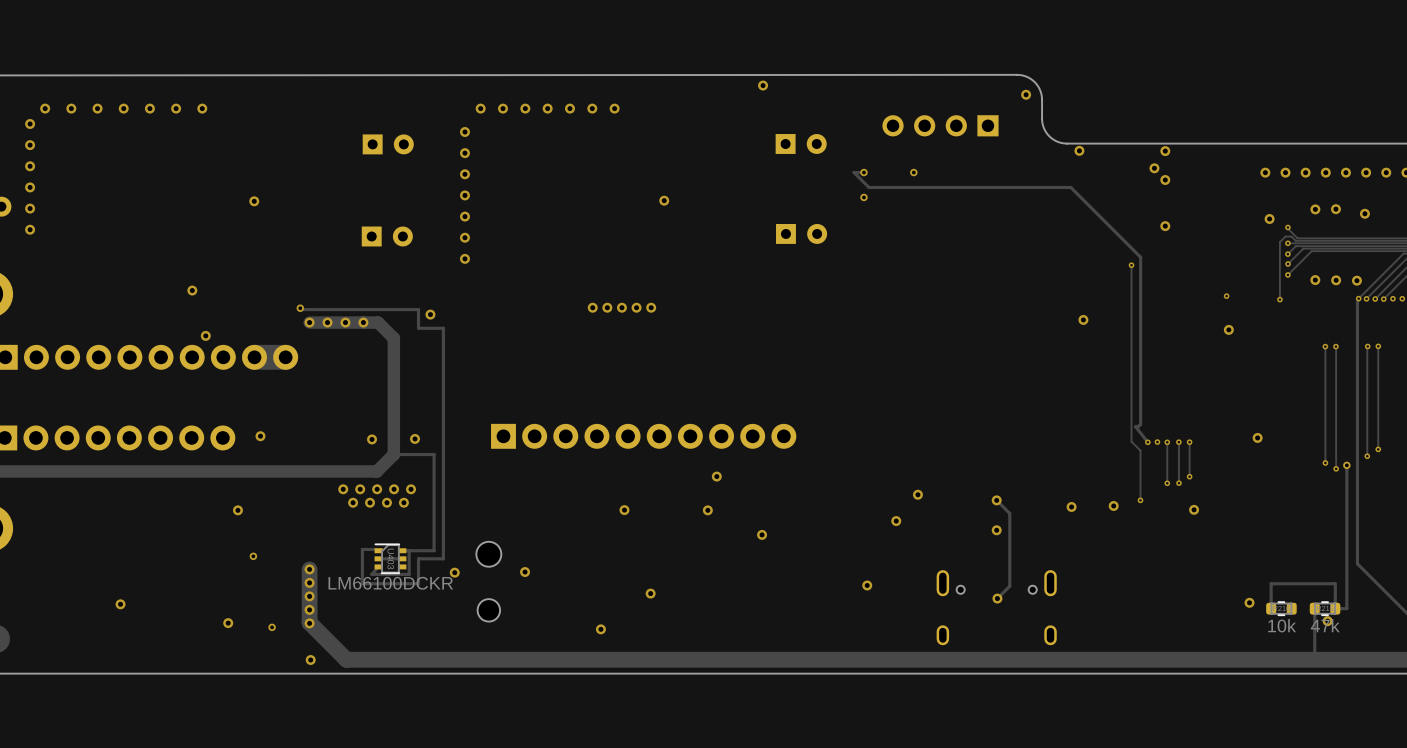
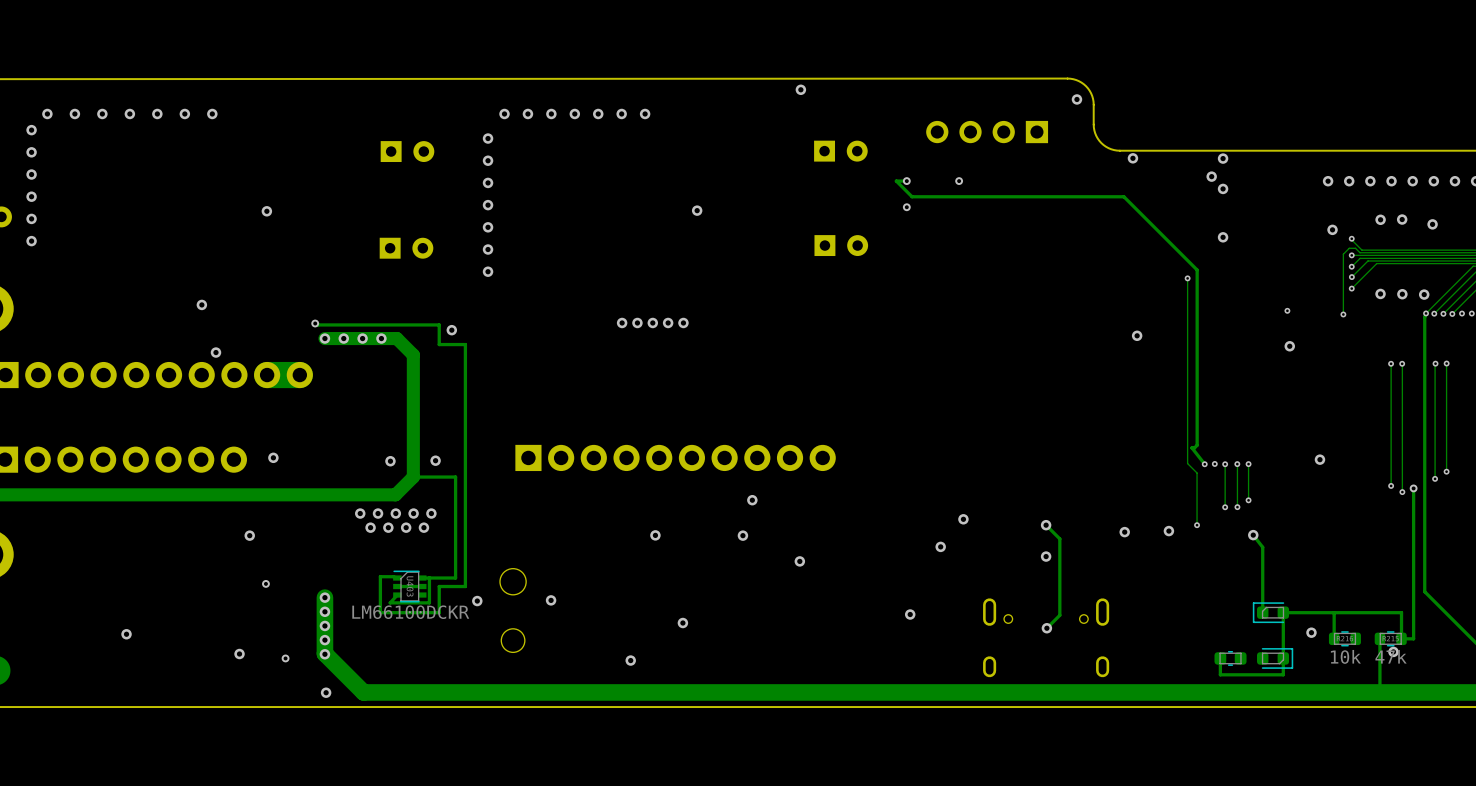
track: none -> (1253, 535) (1262, 547) (1262, 612)
part: none -> (1270, 612)
track: none -> (1334, 612) (1283, 612) (1283, 674) (1220, 674) (1220, 658)
part: none -> (1230, 658)
part: none -> (1275, 658)

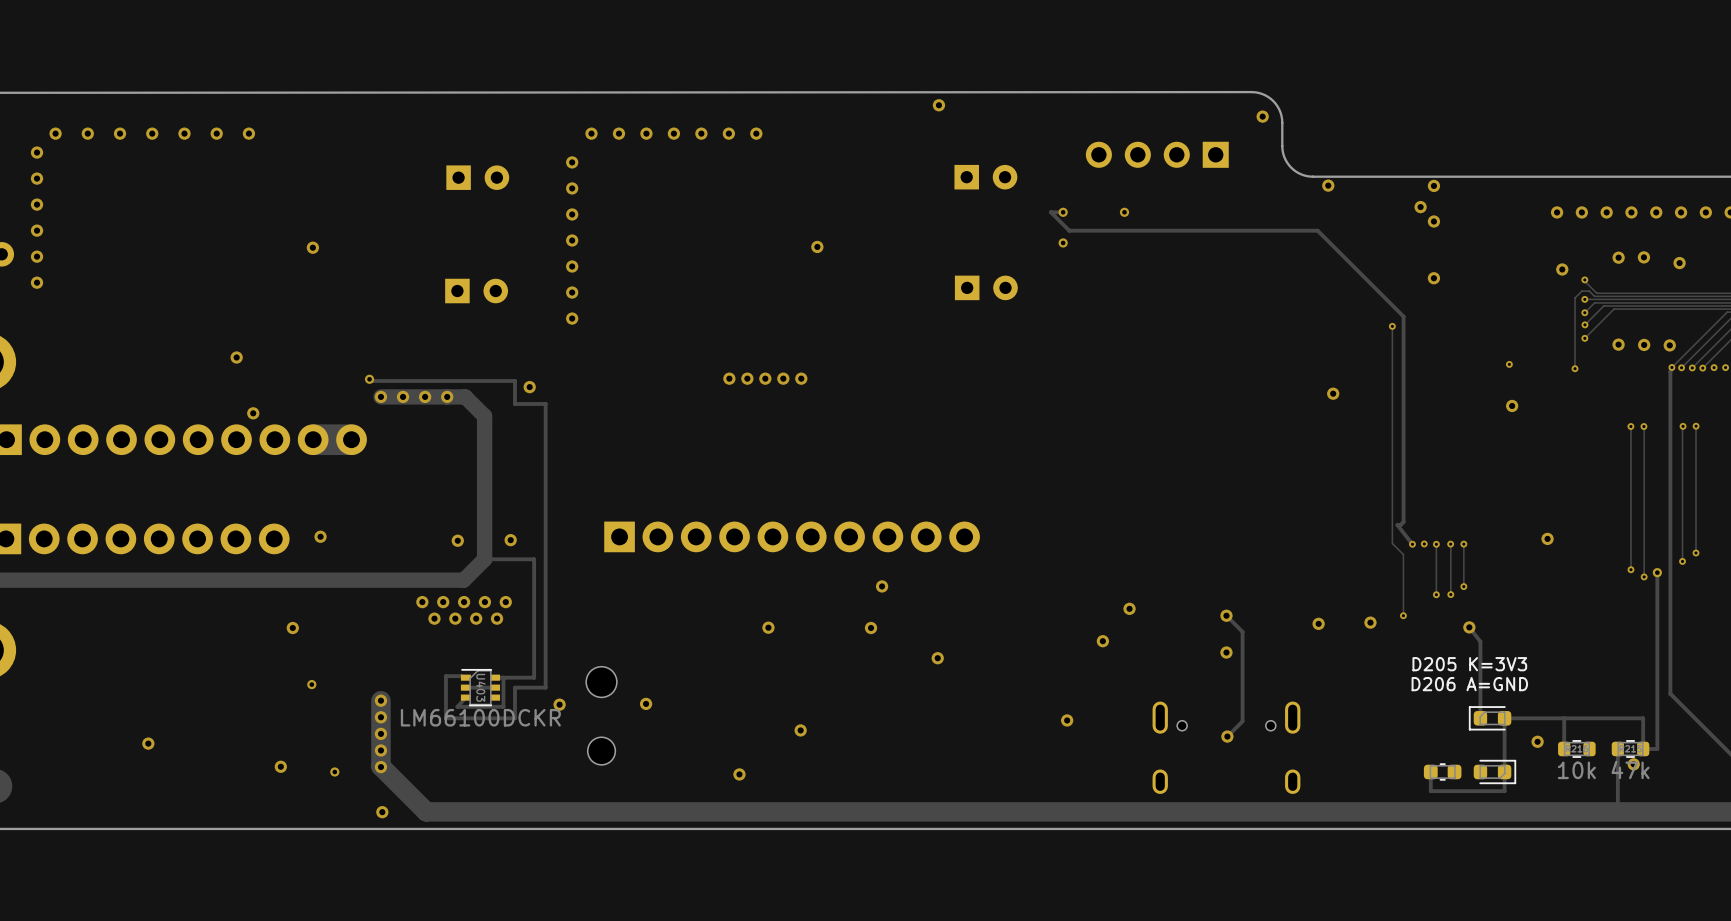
text: none -> D205 K=3V3 (1469, 664)
text: none -> D206 A=GND (1469, 684)

